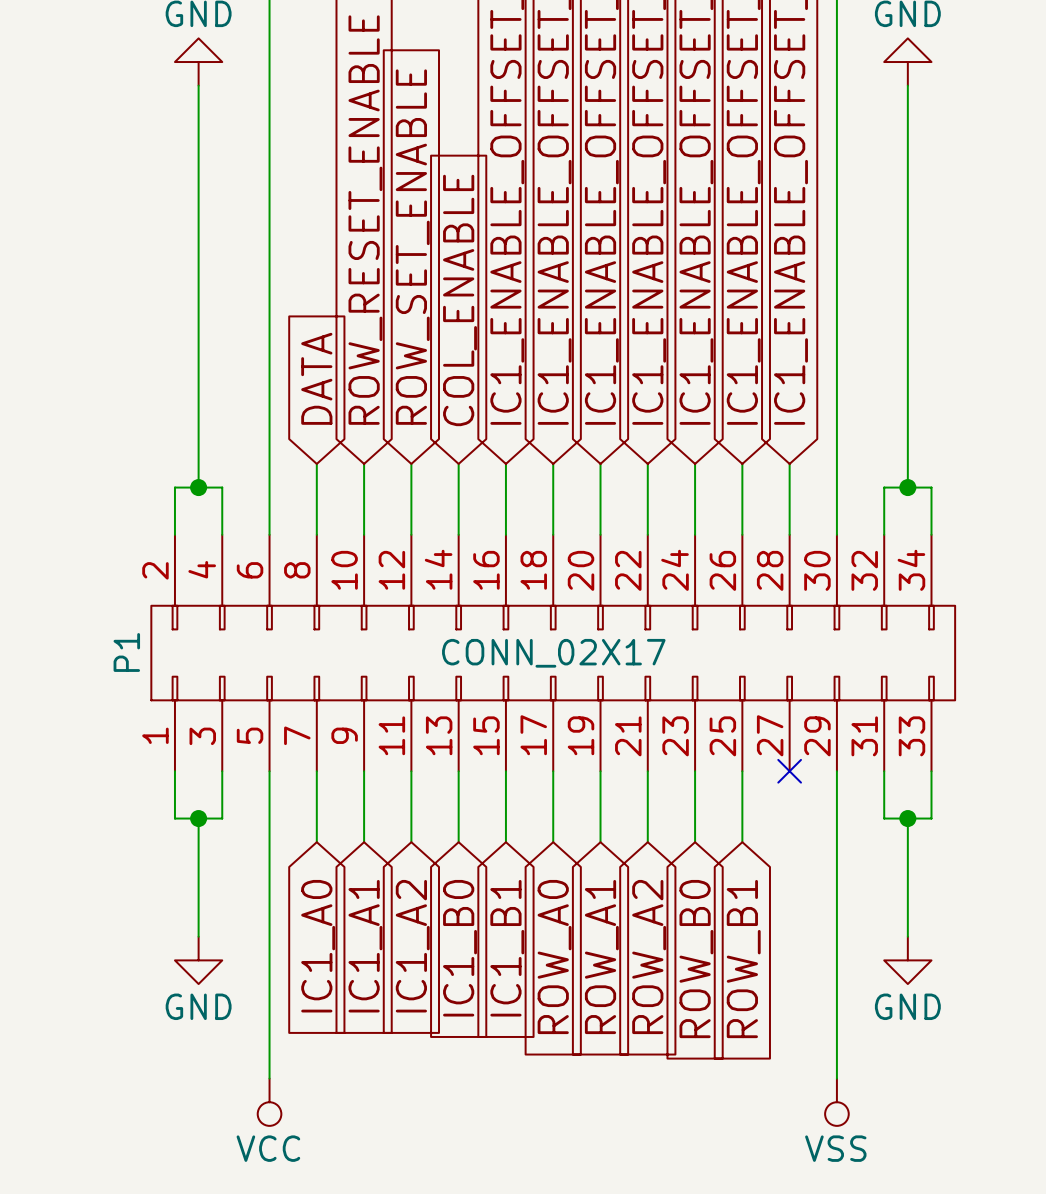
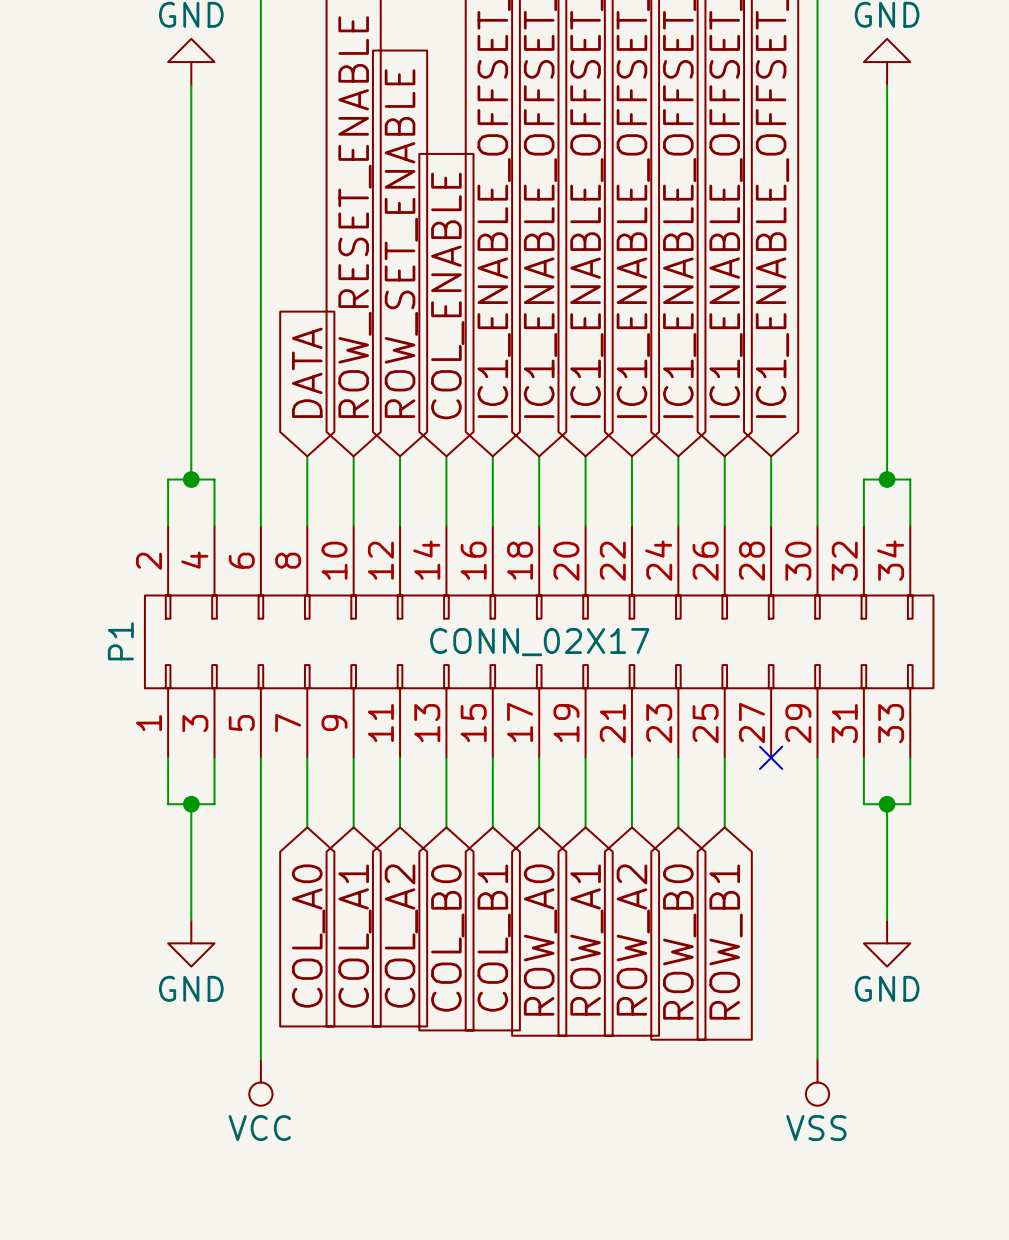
global label: IC1_A0 (318, 946) -> COL_A0 (308, 936)
global label: IC1_A1 (365, 946) -> COL_A1 (354, 936)
global label: IC1_A2 (412, 946) -> COL_A2 (401, 936)
global label: IC1_B0 (460, 948) -> COL_B0 (447, 938)
global label: IC1_B1 (507, 948) -> COL_B1 (494, 938)

